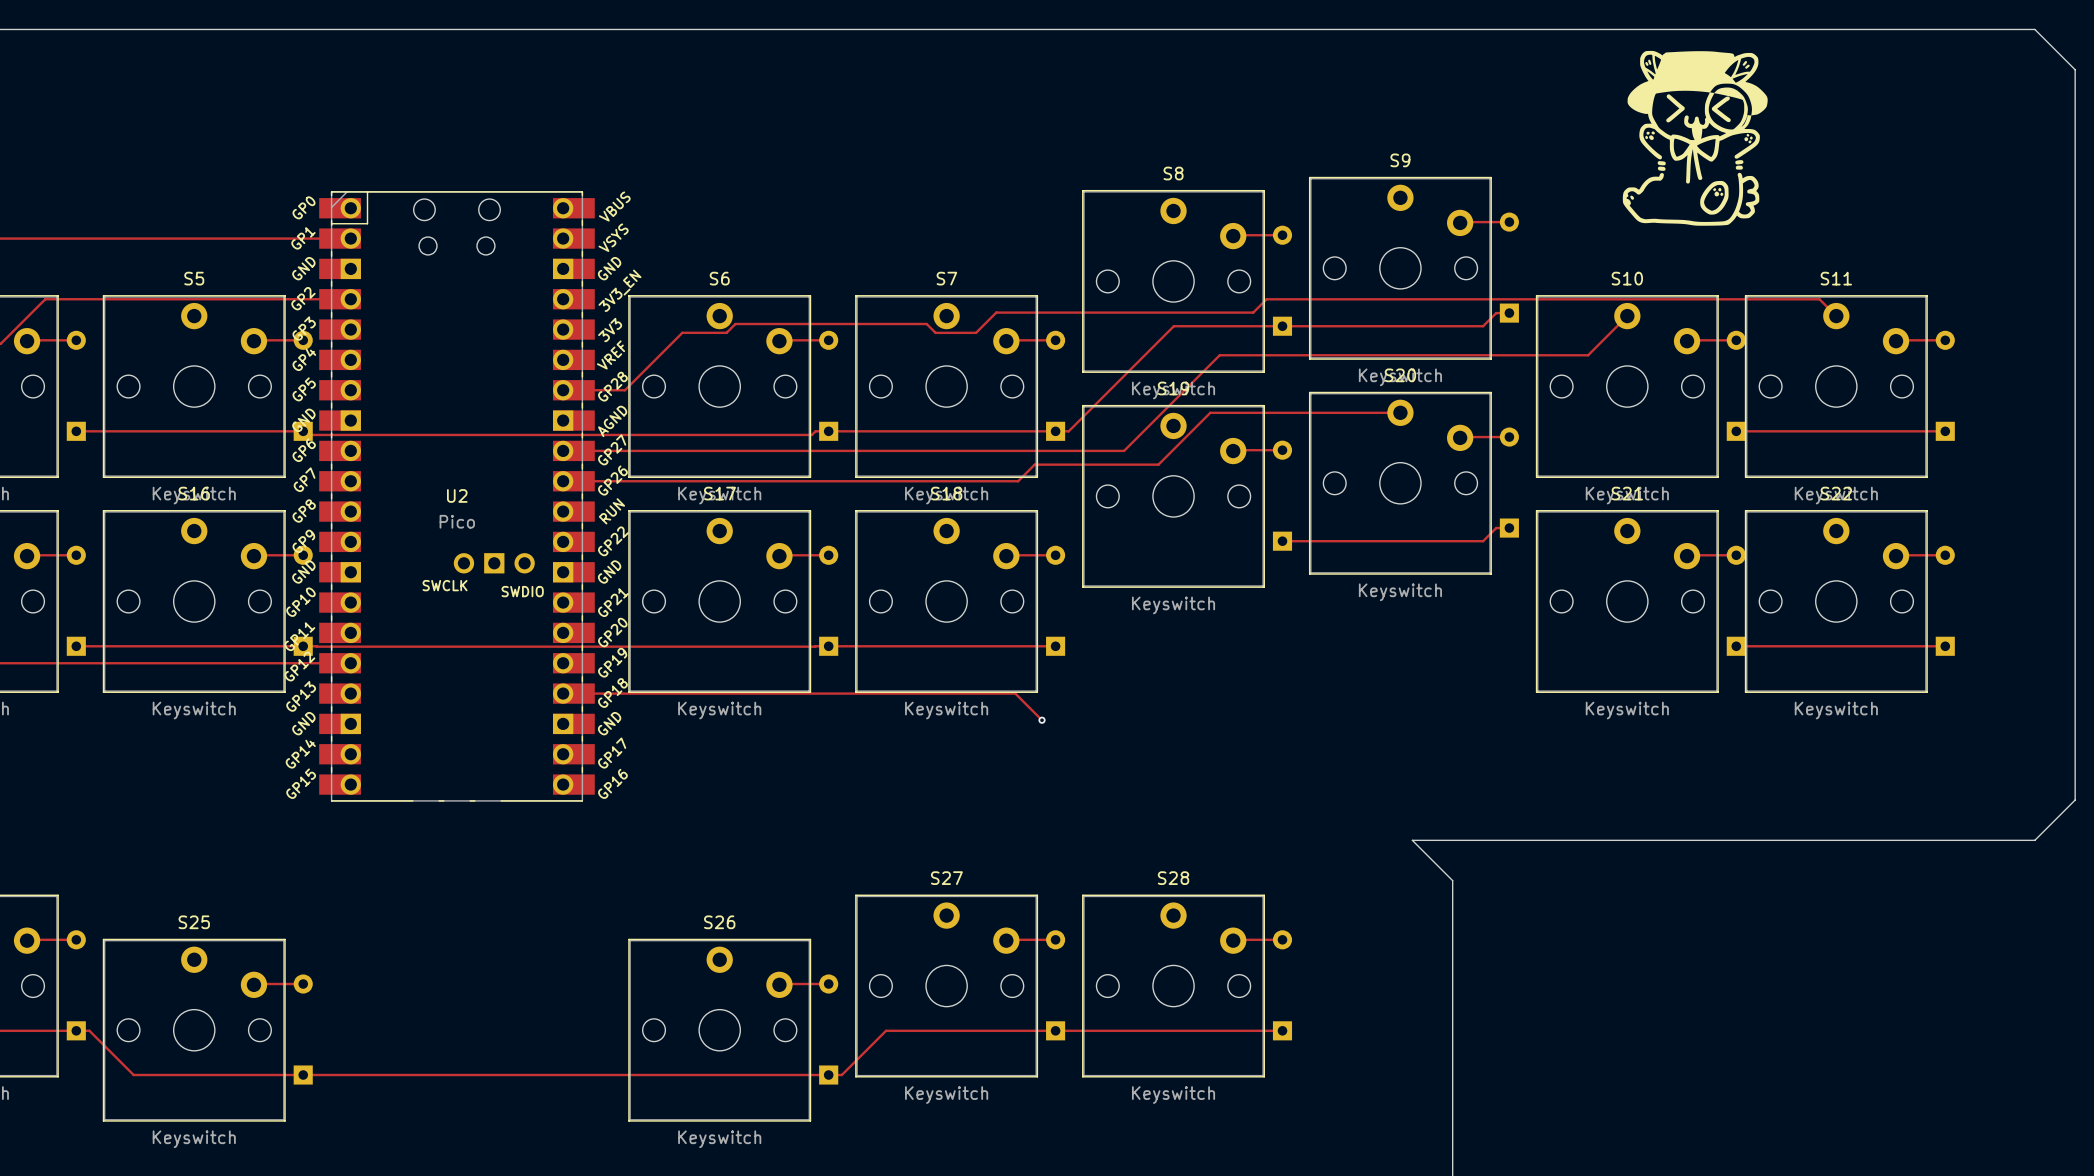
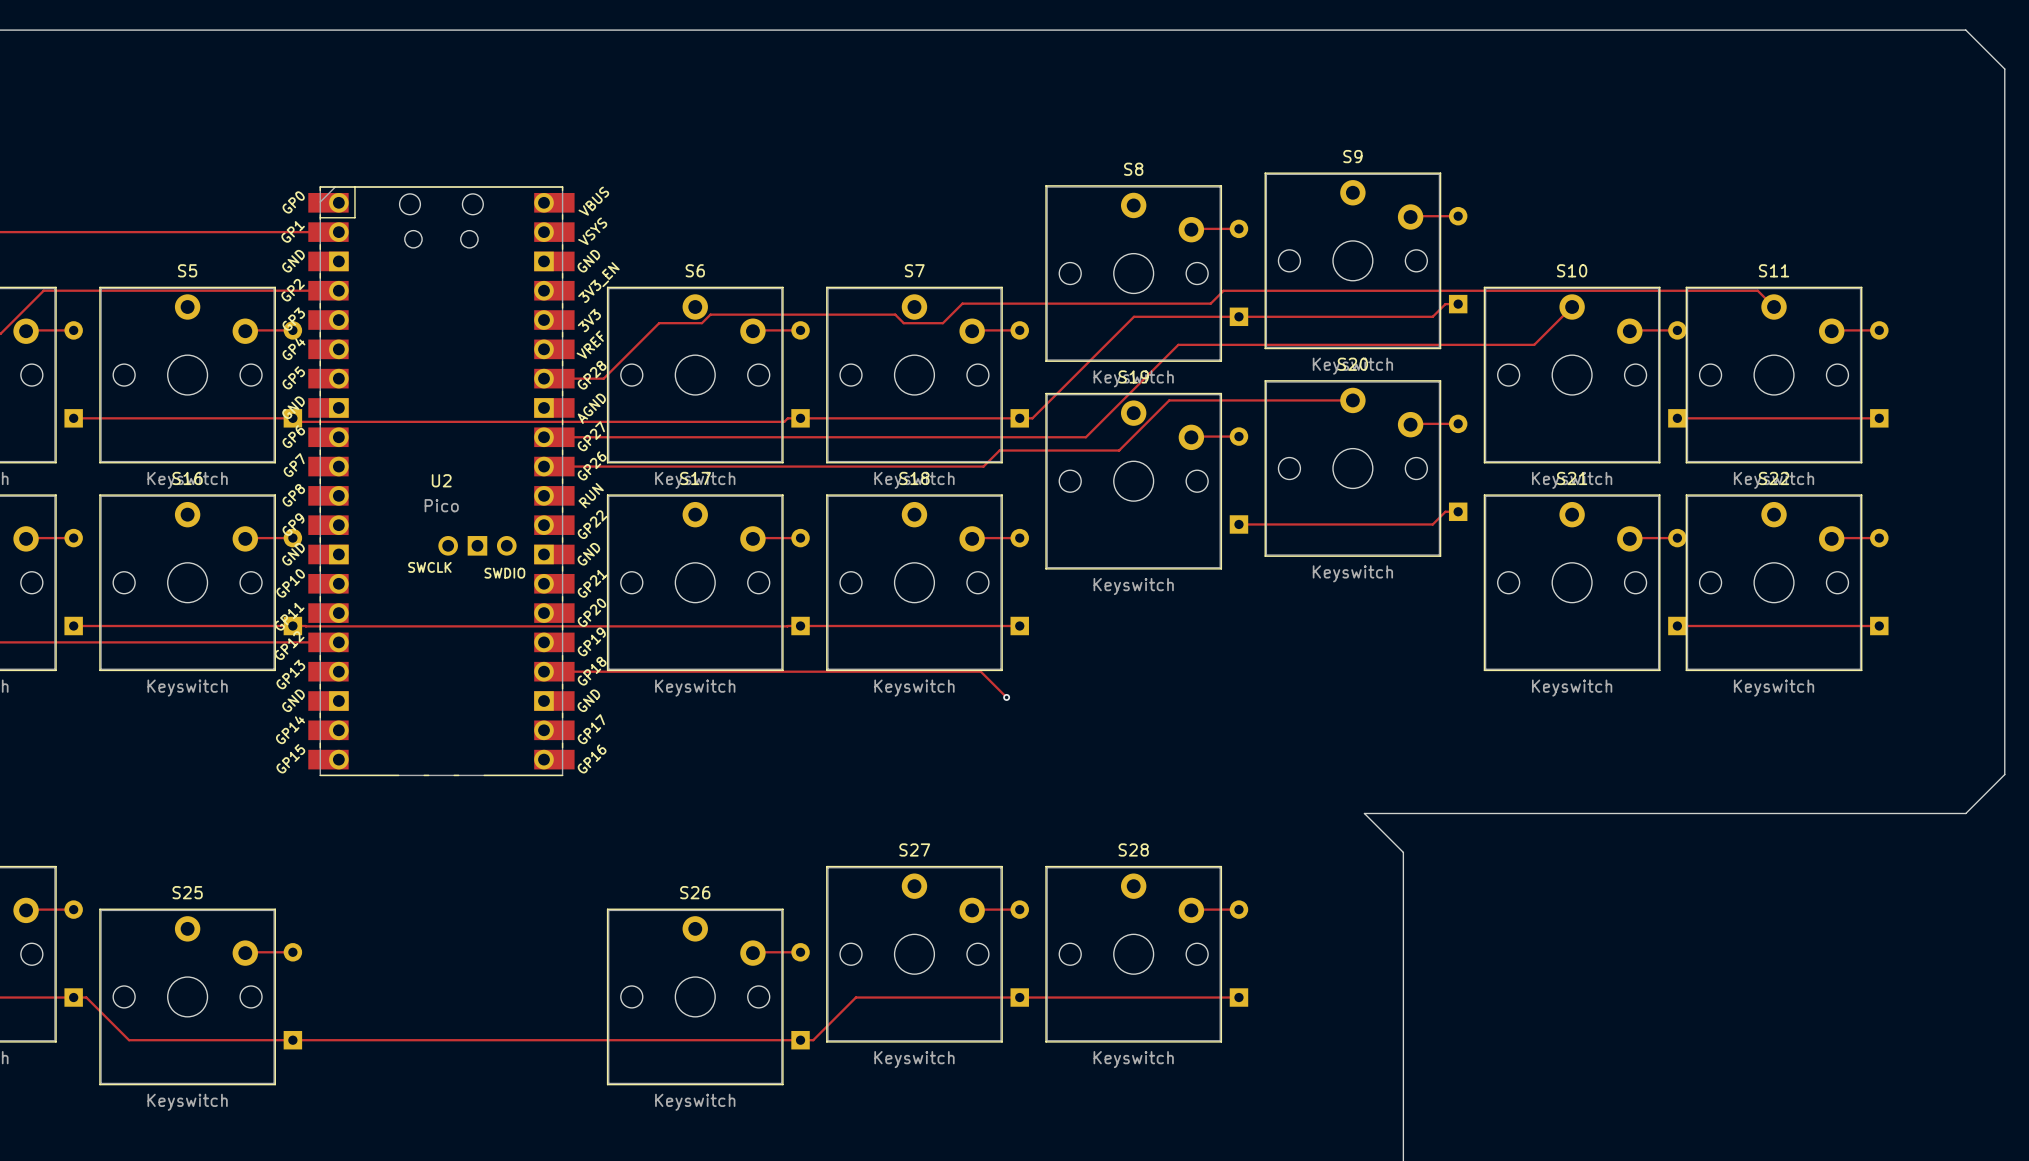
drawing: [1622, 50, 1768, 226] -> none

